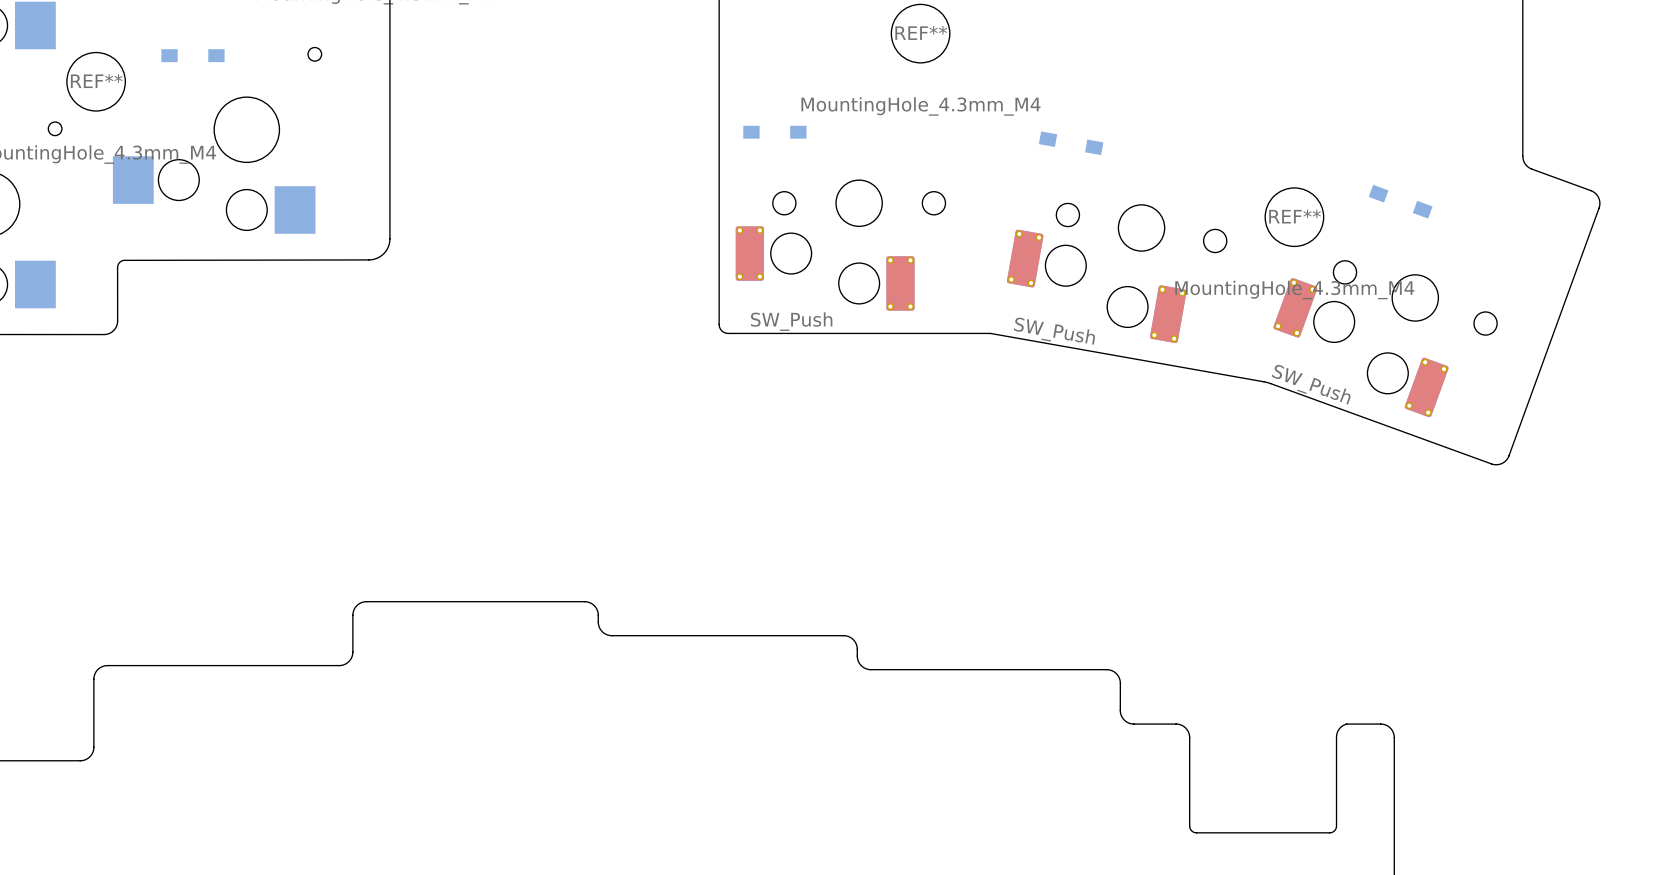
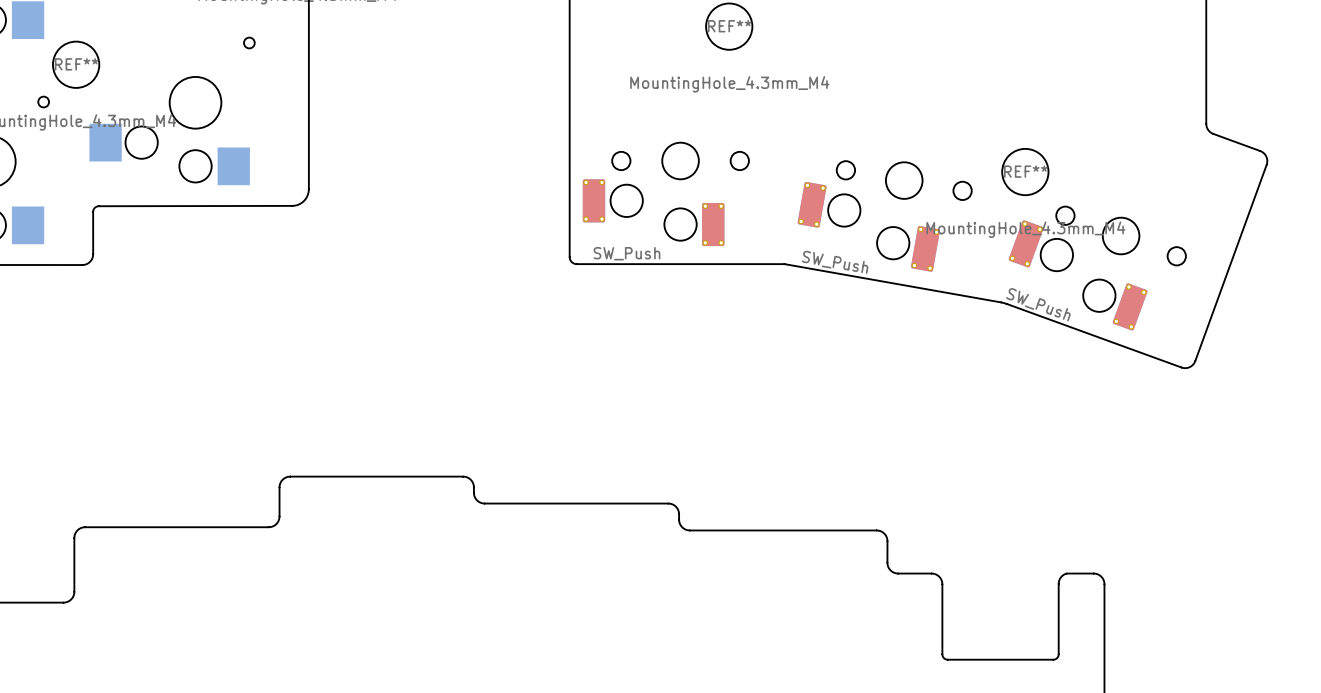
part: (192, 55) -> none
part: (774, 132) -> none
part: (1071, 143) -> none
part: (1400, 201) -> none

